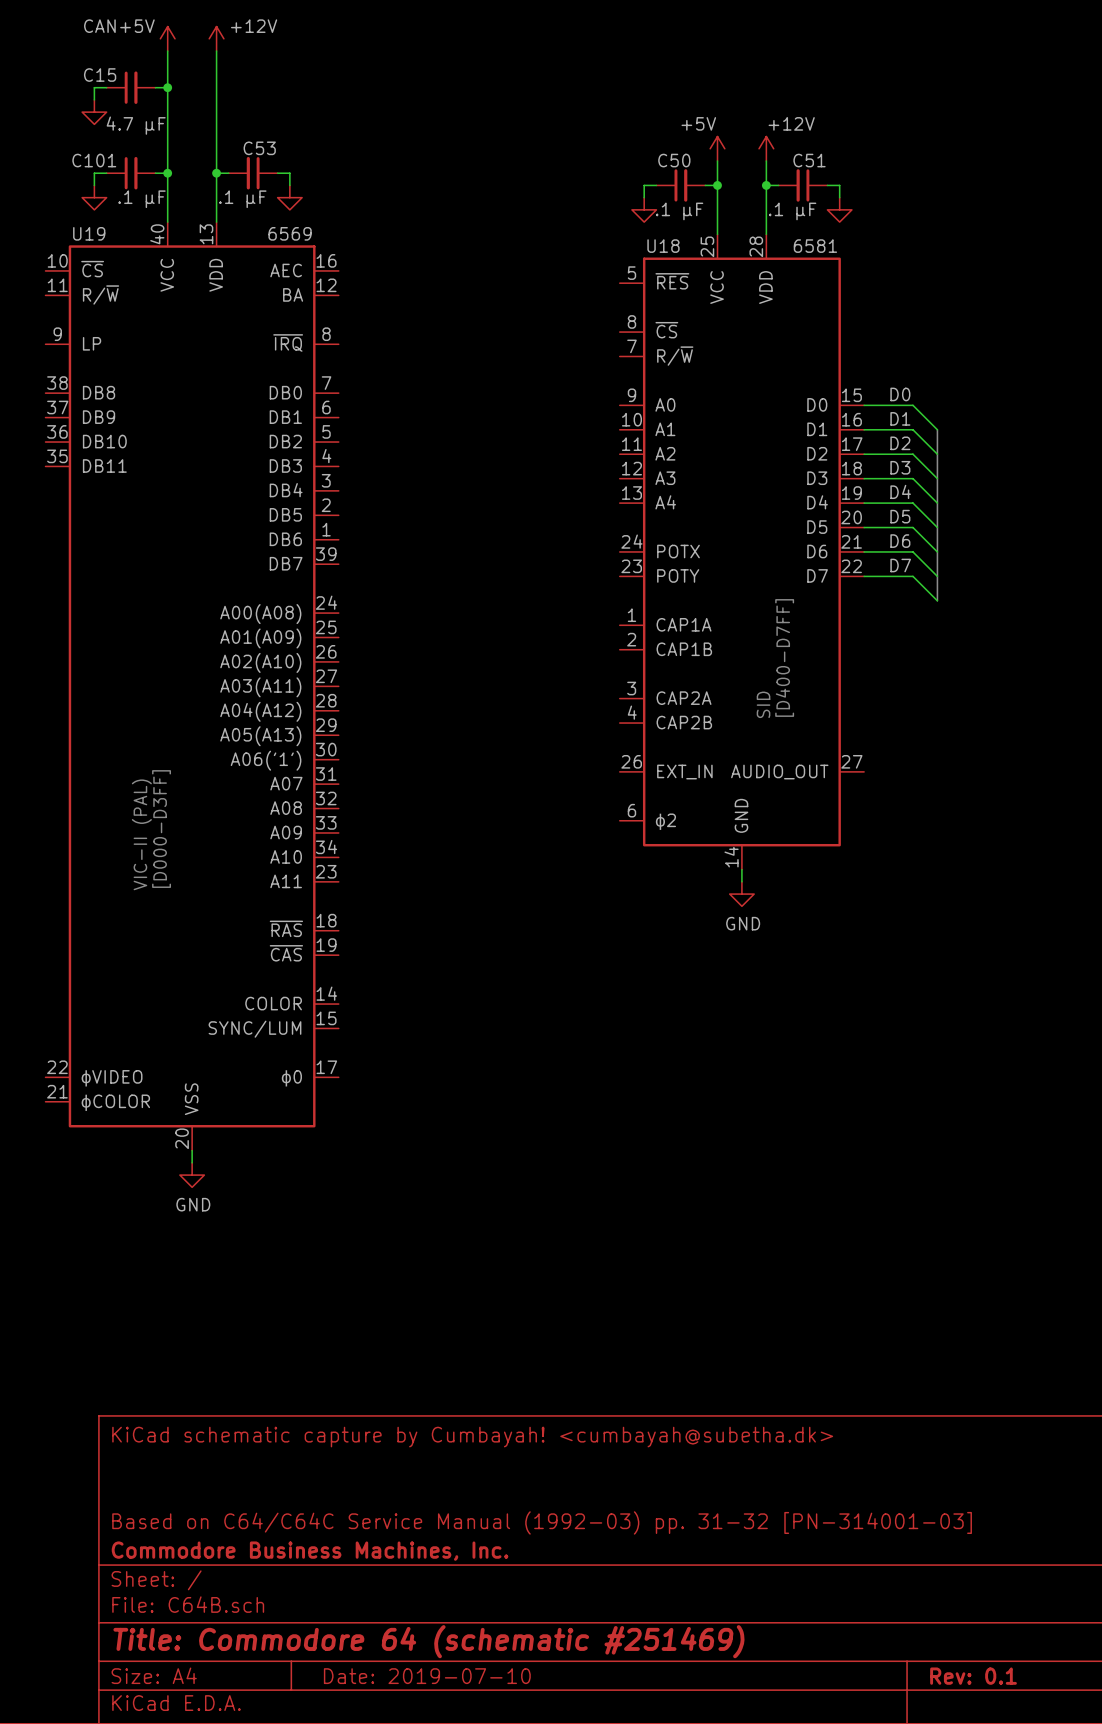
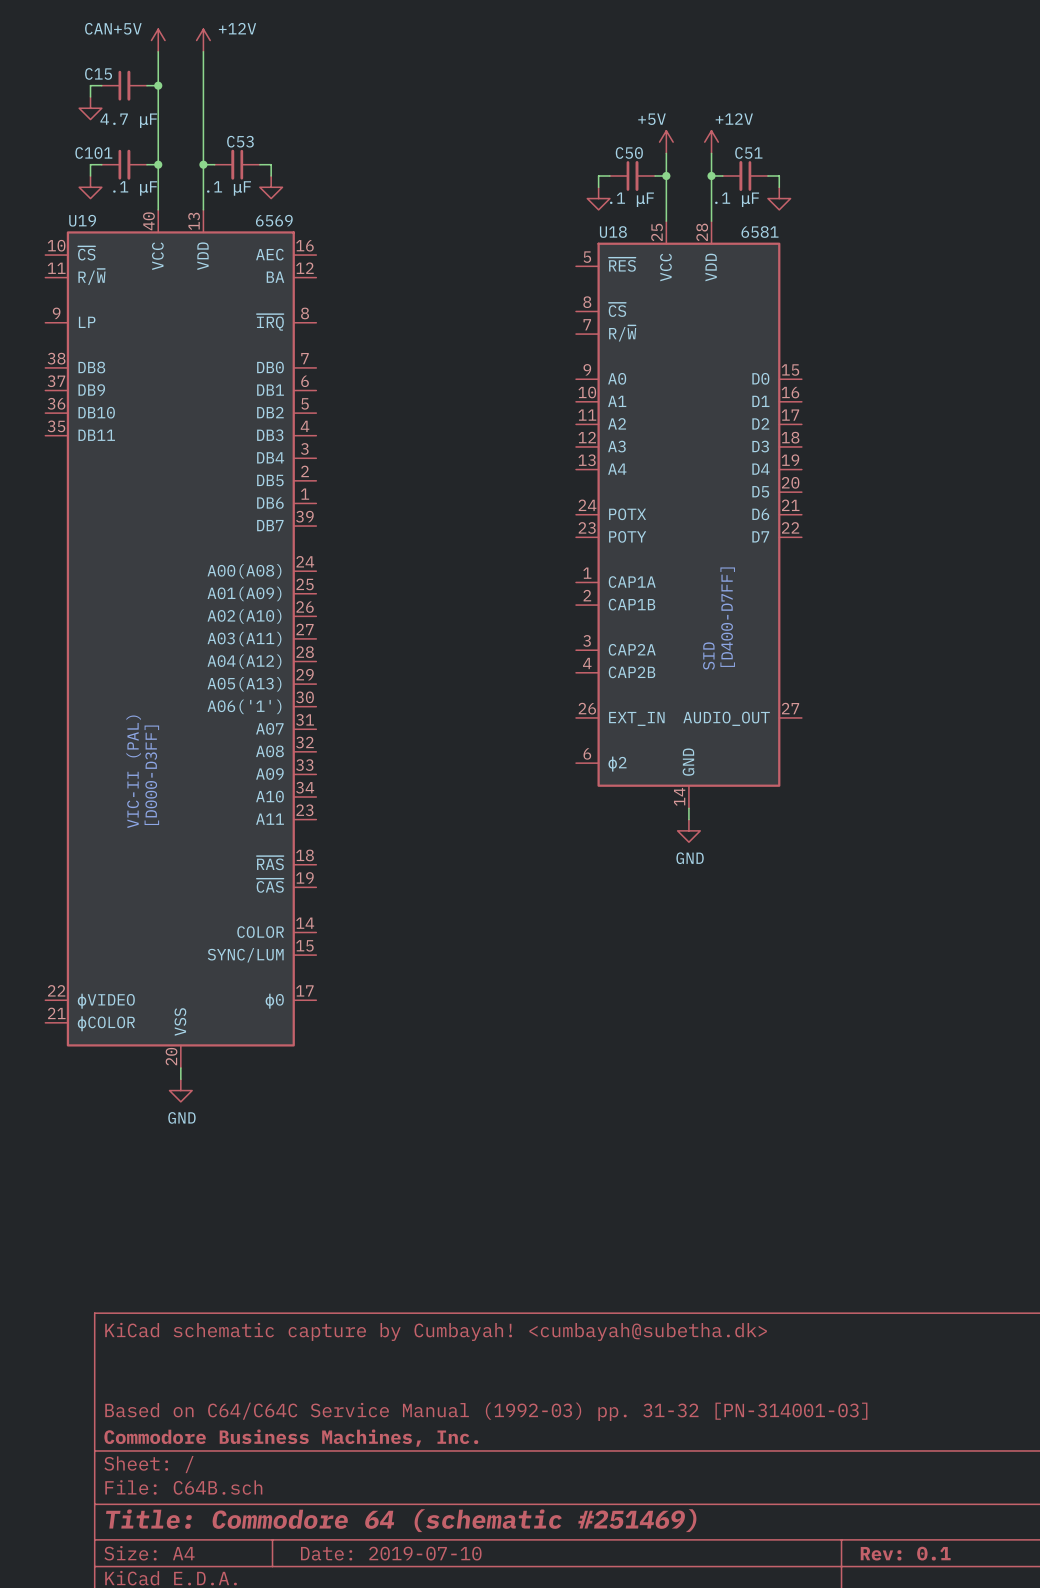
label: D0 (900, 394) -> none
wire: (864, 405) (912, 405) (937, 429) -> none
label: D1 (900, 418) -> none
wire: (864, 429) (912, 429) (937, 454) -> none
bus: (937, 429) (937, 600) -> none
label: D2 (900, 443) -> none
wire: (864, 454) (912, 454) (937, 478) -> none
label: D3 (900, 467) -> none
wire: (864, 478) (912, 478) (937, 503) -> none
label: D4 (900, 491) -> none
wire: (864, 503) (912, 503) (937, 527) -> none
label: D5 (900, 516) -> none
wire: (864, 527) (912, 527) (937, 551) -> none
label: D6 (900, 541) -> none
wire: (864, 551) (912, 551) (937, 576) -> none
label: D7 (900, 565) -> none
wire: (864, 576) (912, 576) (937, 600) -> none

